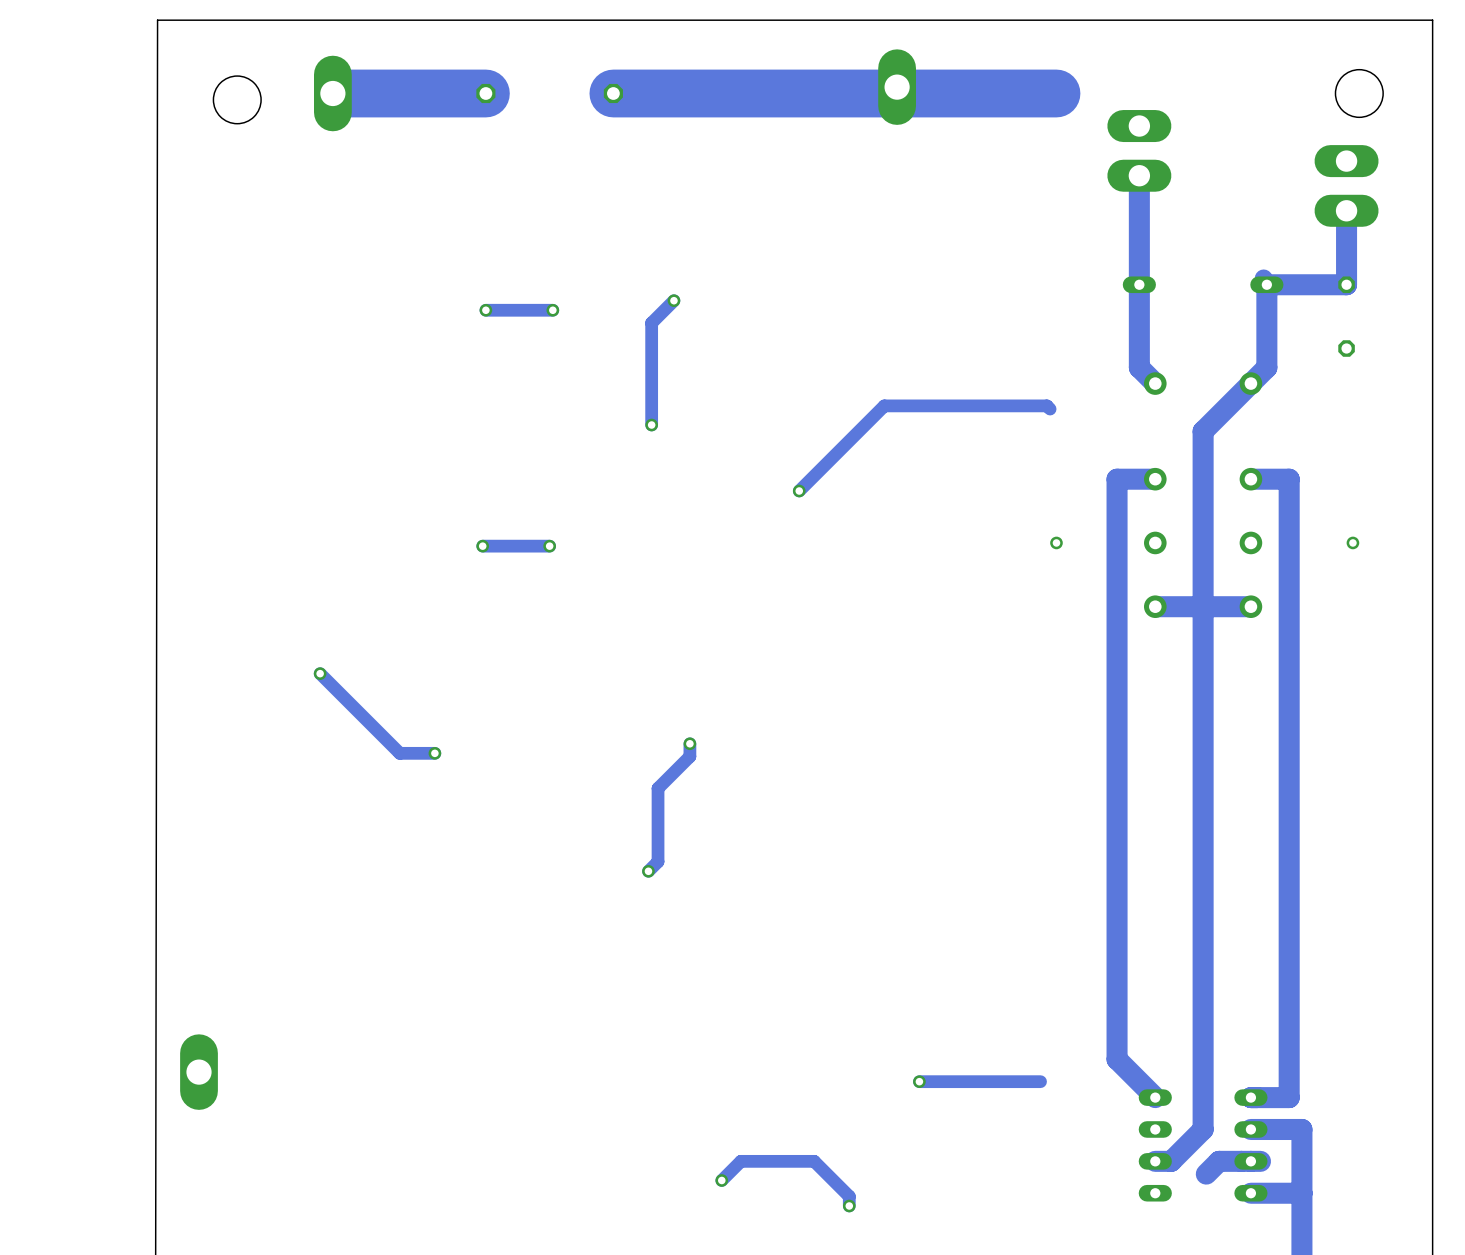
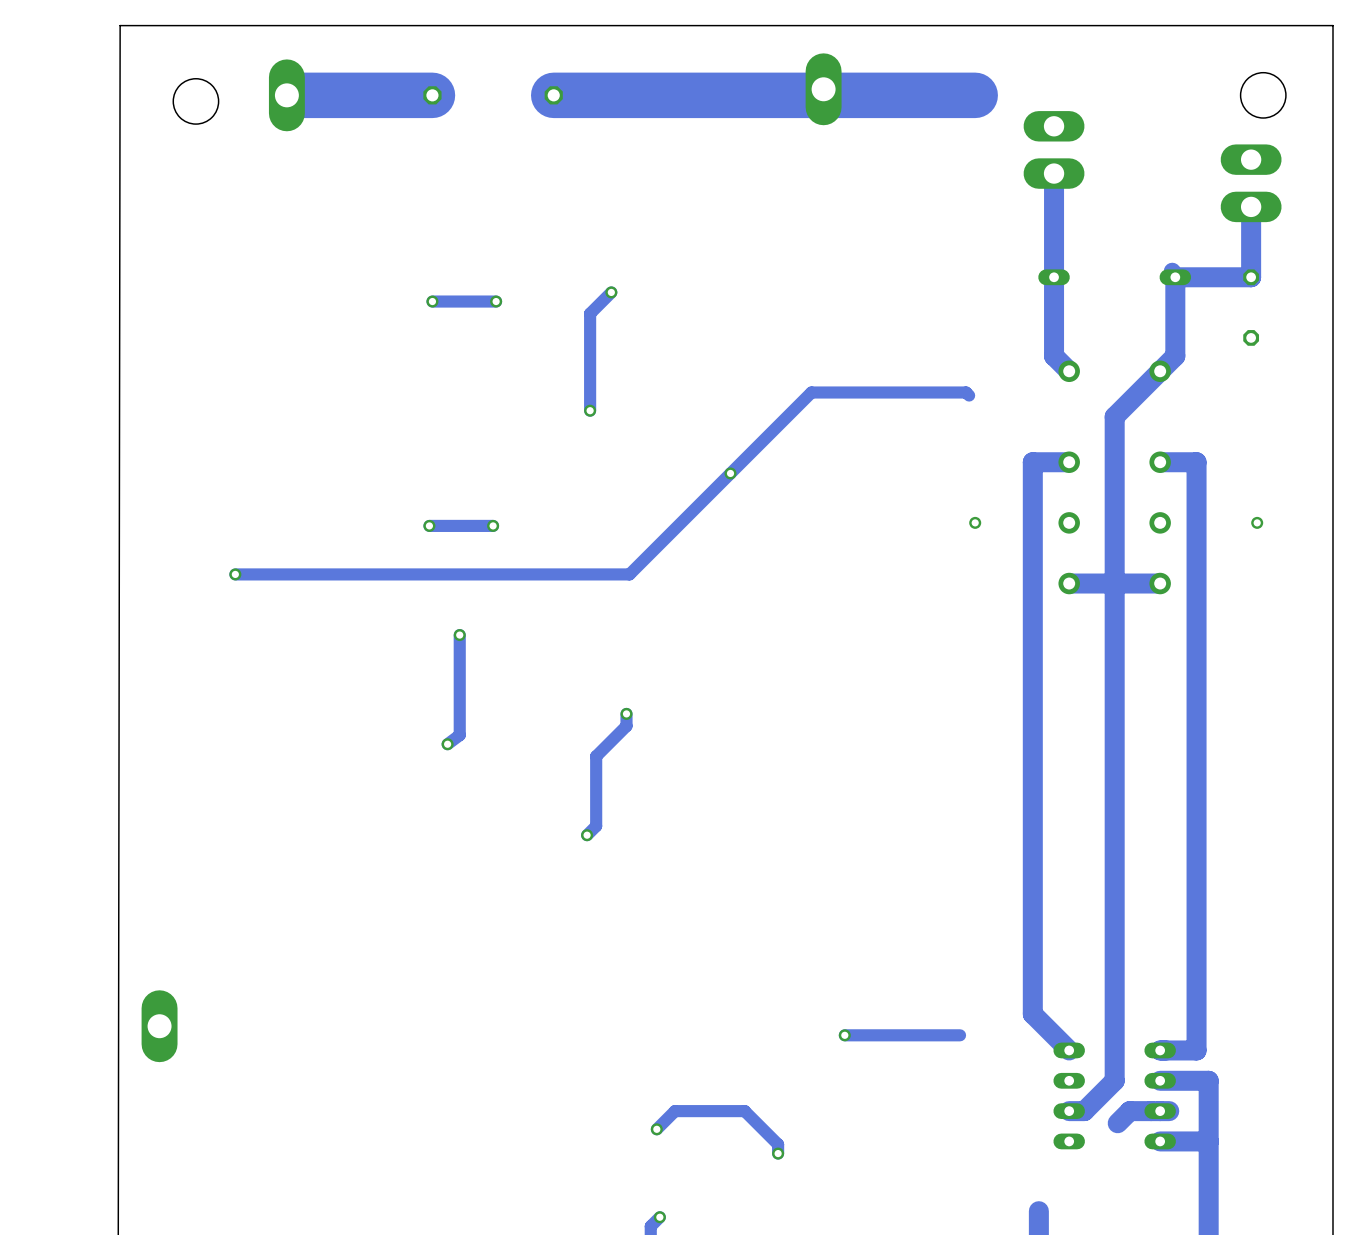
track: none -> (730, 473) (629, 574) (235, 574)
via: none -> (235, 574)
track: none -> (459, 635) (459, 735) (447, 744)
via: none -> (459, 635)
track: (320, 673) (399, 753) (434, 753) -> none
via: (320, 673) -> none
via: (434, 753) -> none
via: none -> (447, 744)

